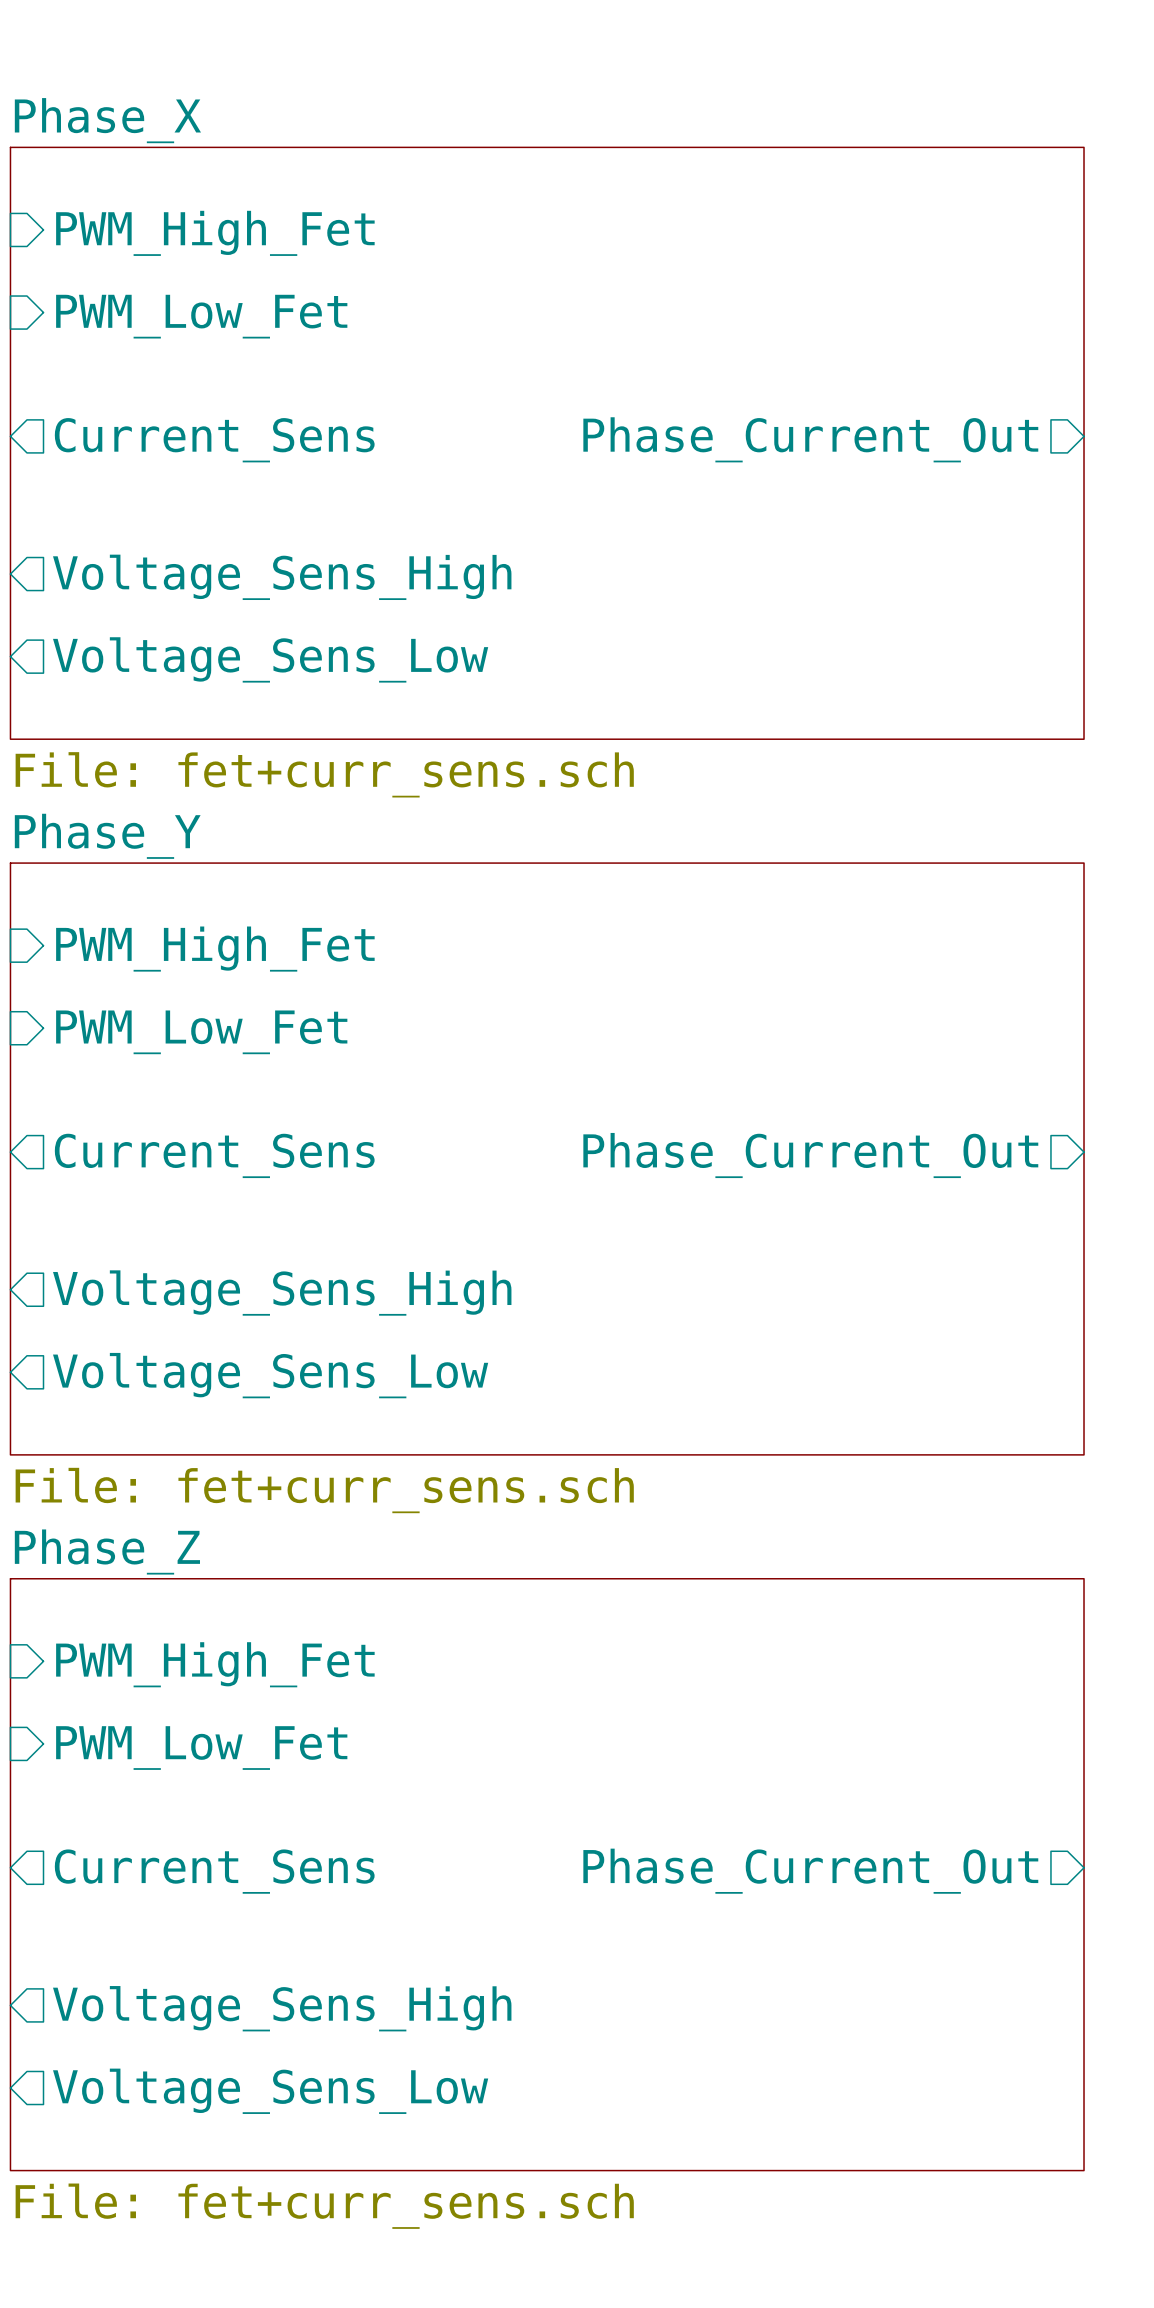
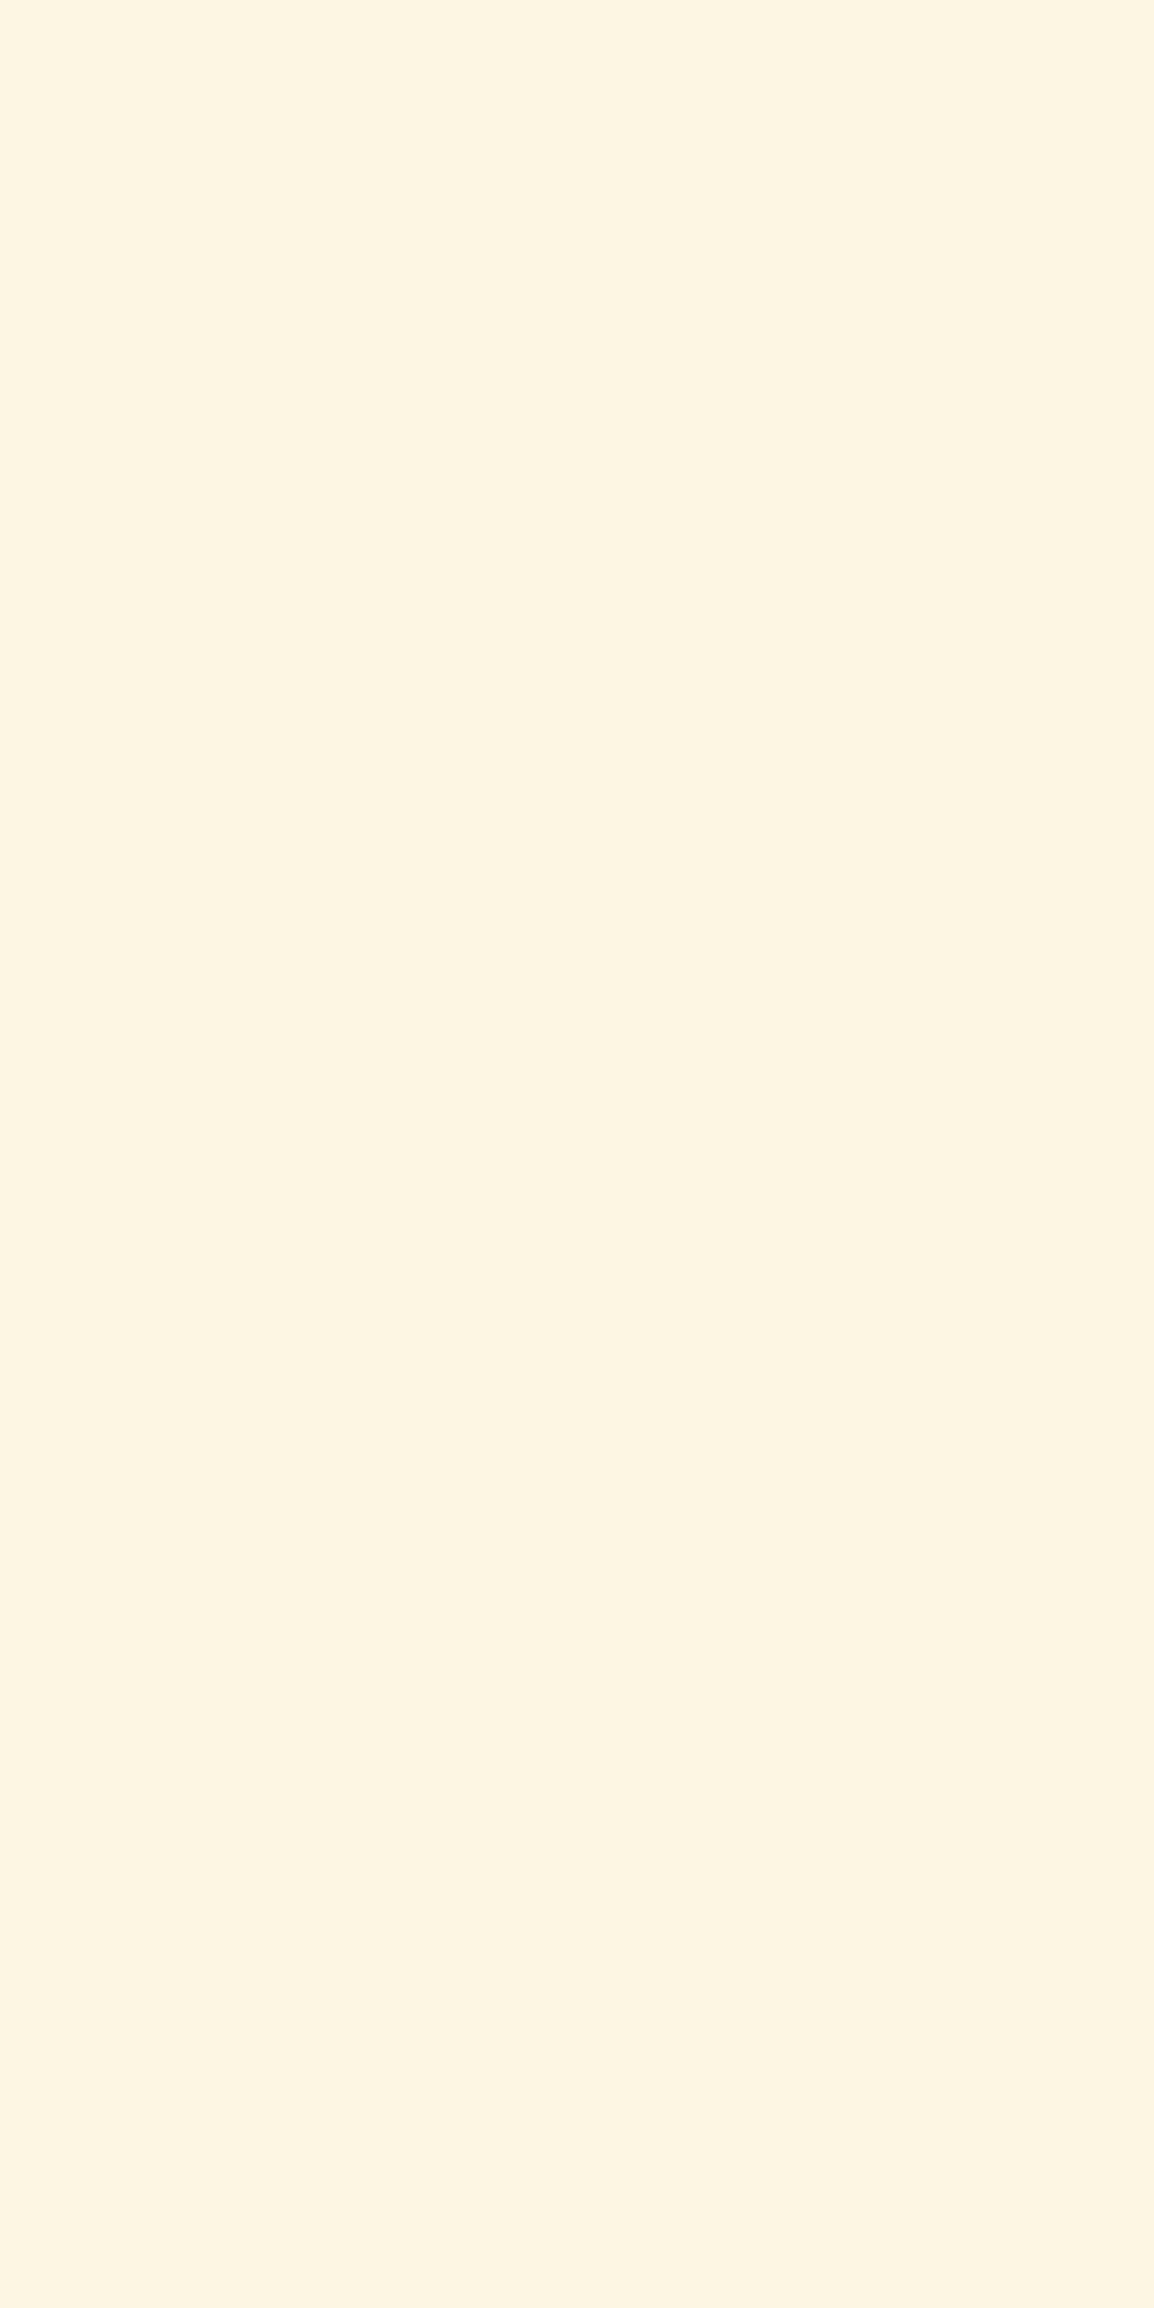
sheet pin: PWM_High_Fet (215, 233) -> none
sheet pin: PWM_Low_Fet (201, 316) -> none
sheet pin: Phase_Current_Out (810, 439) -> none
sheet pin: Current_Sens (214, 440) -> none
sheet Phase_X: File: fet+curr_sens.sch (547, 443) -> none
sheet pin: Voltage_Sens_High (282, 577) -> none
sheet pin: Voltage_Sens_Low (270, 659) -> none
sheet pin: PWM_High_Fet (215, 949) -> none
sheet pin: PWM_Low_Fet (201, 1032) -> none
sheet pin: Current_Sens (214, 1155) -> none
sheet pin: Phase_Current_Out (810, 1155) -> none
sheet Phase_Y: File: fet+curr_sens.sch (547, 1158) -> none
sheet pin: Voltage_Sens_High (282, 1293) -> none
sheet pin: Voltage_Sens_Low (270, 1375) -> none
sheet pin: PWM_High_Fet (215, 1664) -> none
sheet pin: PWM_Low_Fet (201, 1748) -> none
sheet pin: Current_Sens (214, 1871) -> none
sheet pin: Phase_Current_Out (810, 1871) -> none
sheet Phase_Z: File: fet+curr_sens.sch (547, 1874) -> none
sheet pin: Voltage_Sens_High (282, 2008) -> none
sheet pin: Voltage_Sens_Low (270, 2091) -> none

